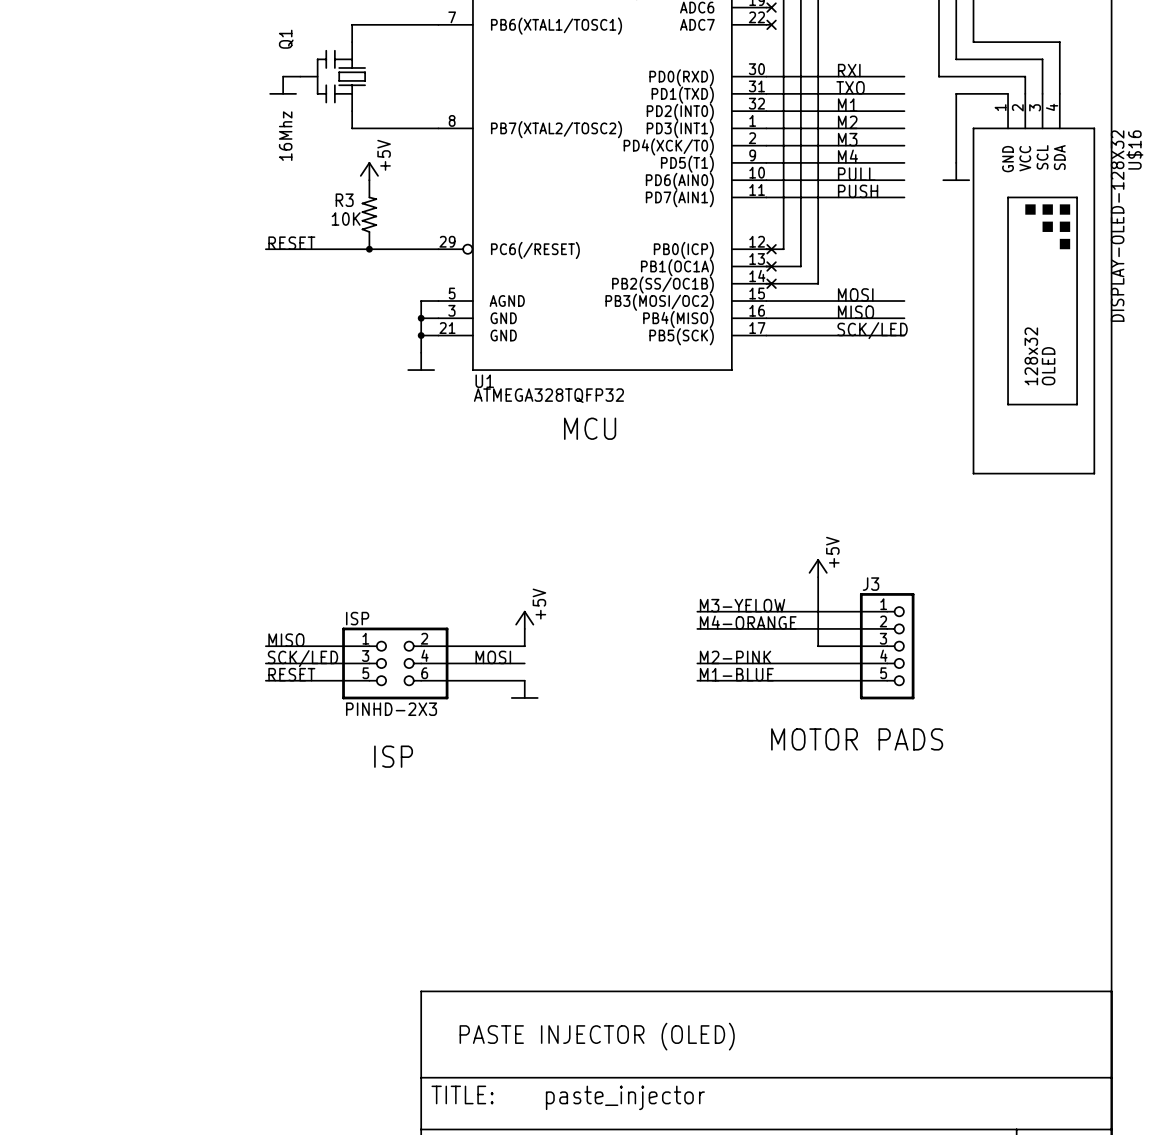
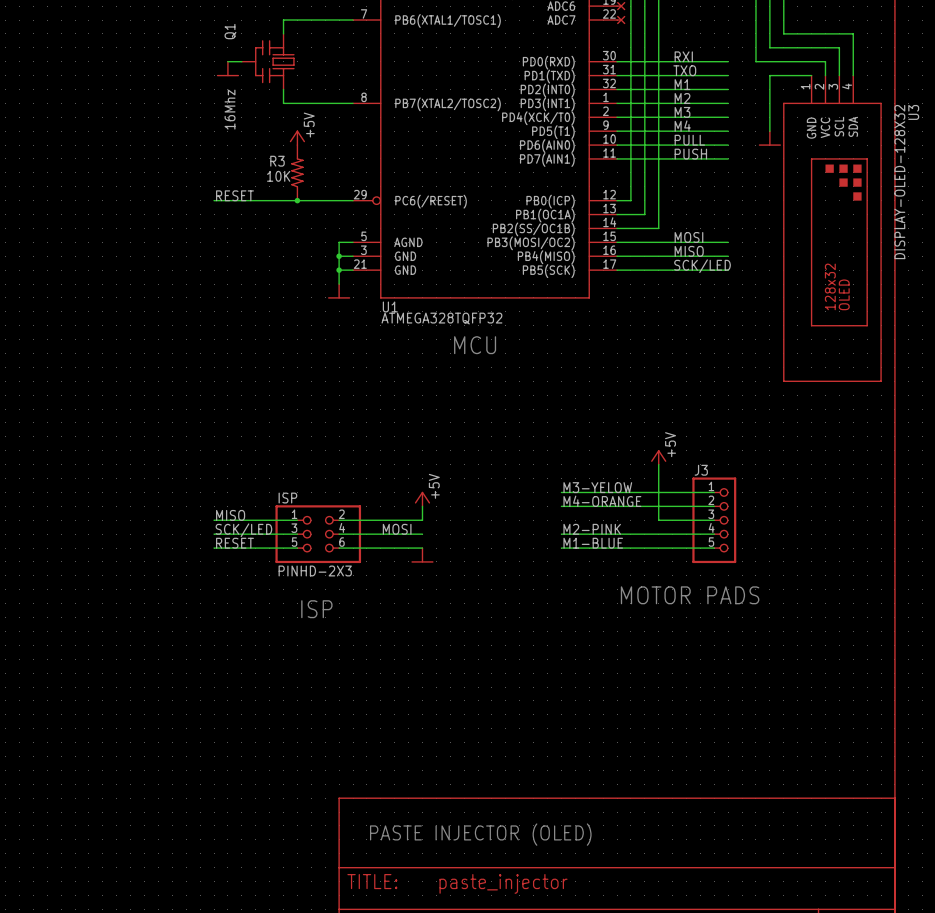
U$16 name: U$16 (1134, 150) -> U3 (913, 112)
part: (771, 249) -> none
part: (771, 266) -> none
part: (771, 283) -> none

